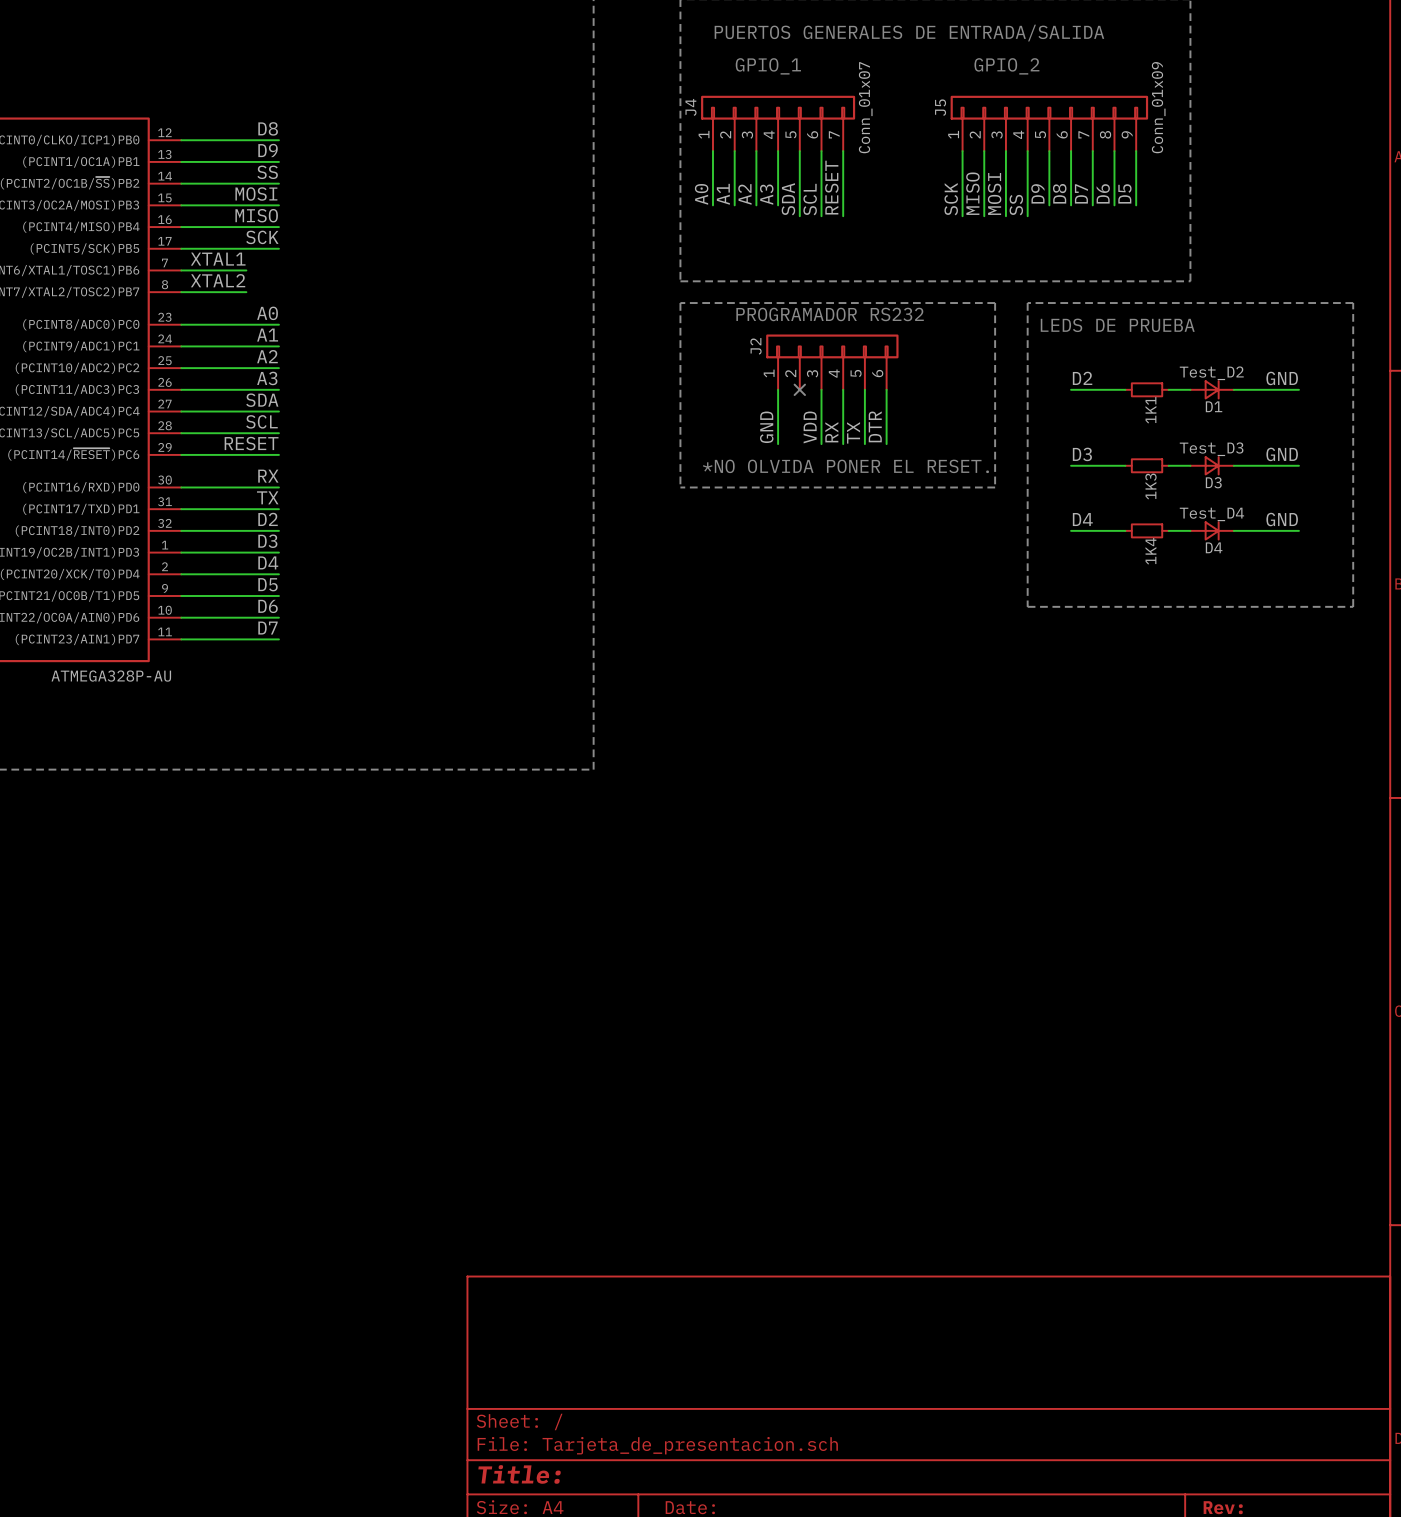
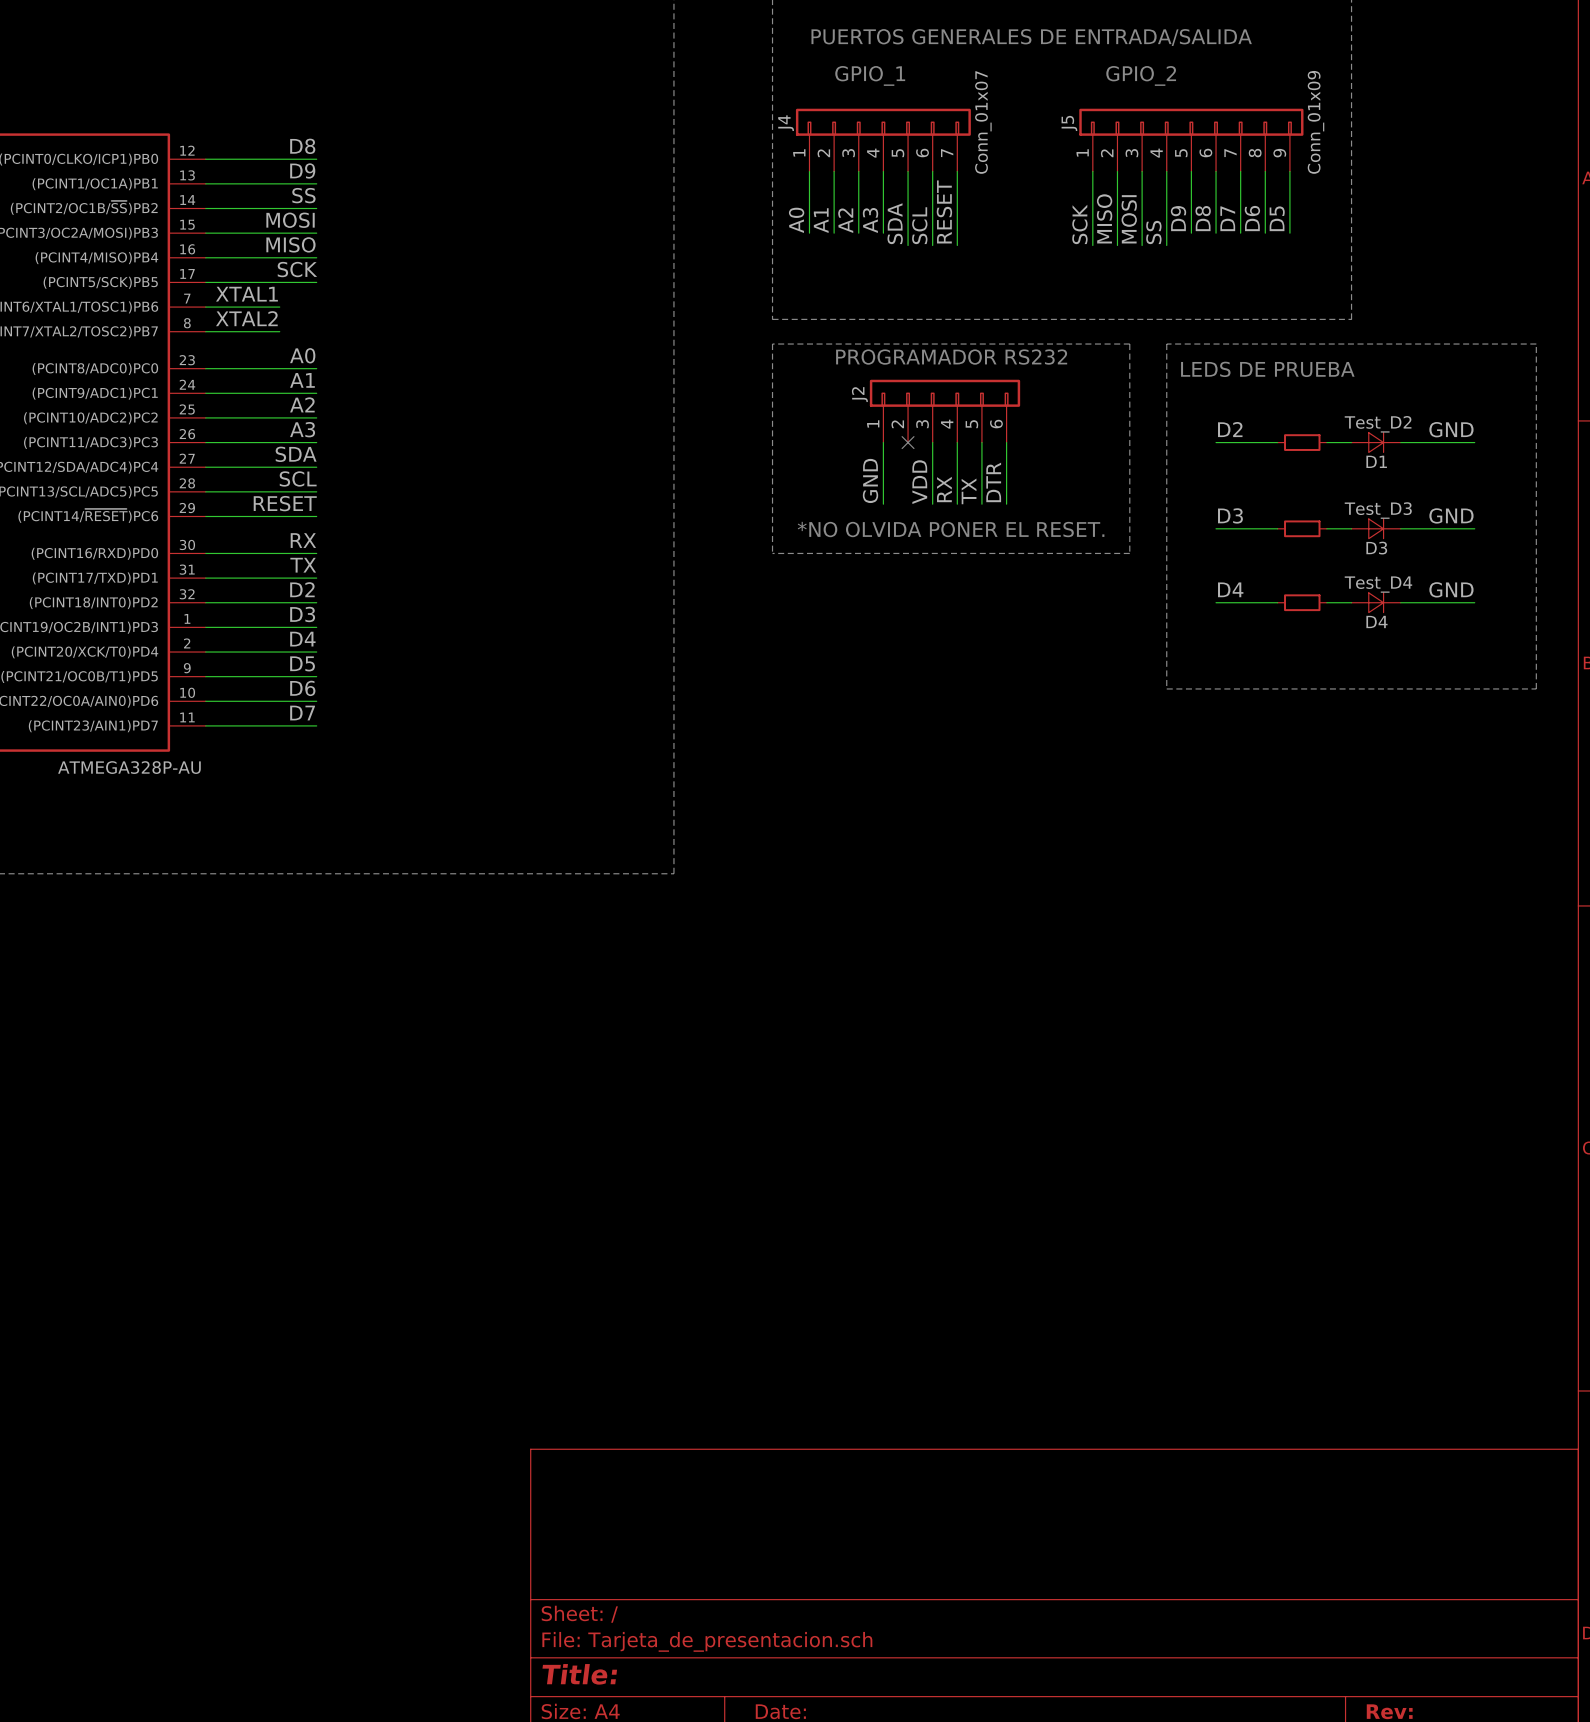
1K1 name: 1K1 (1150, 410) -> none
1K3 name: 1K3 (1150, 486) -> none
1K4 name: 1K4 (1150, 551) -> none

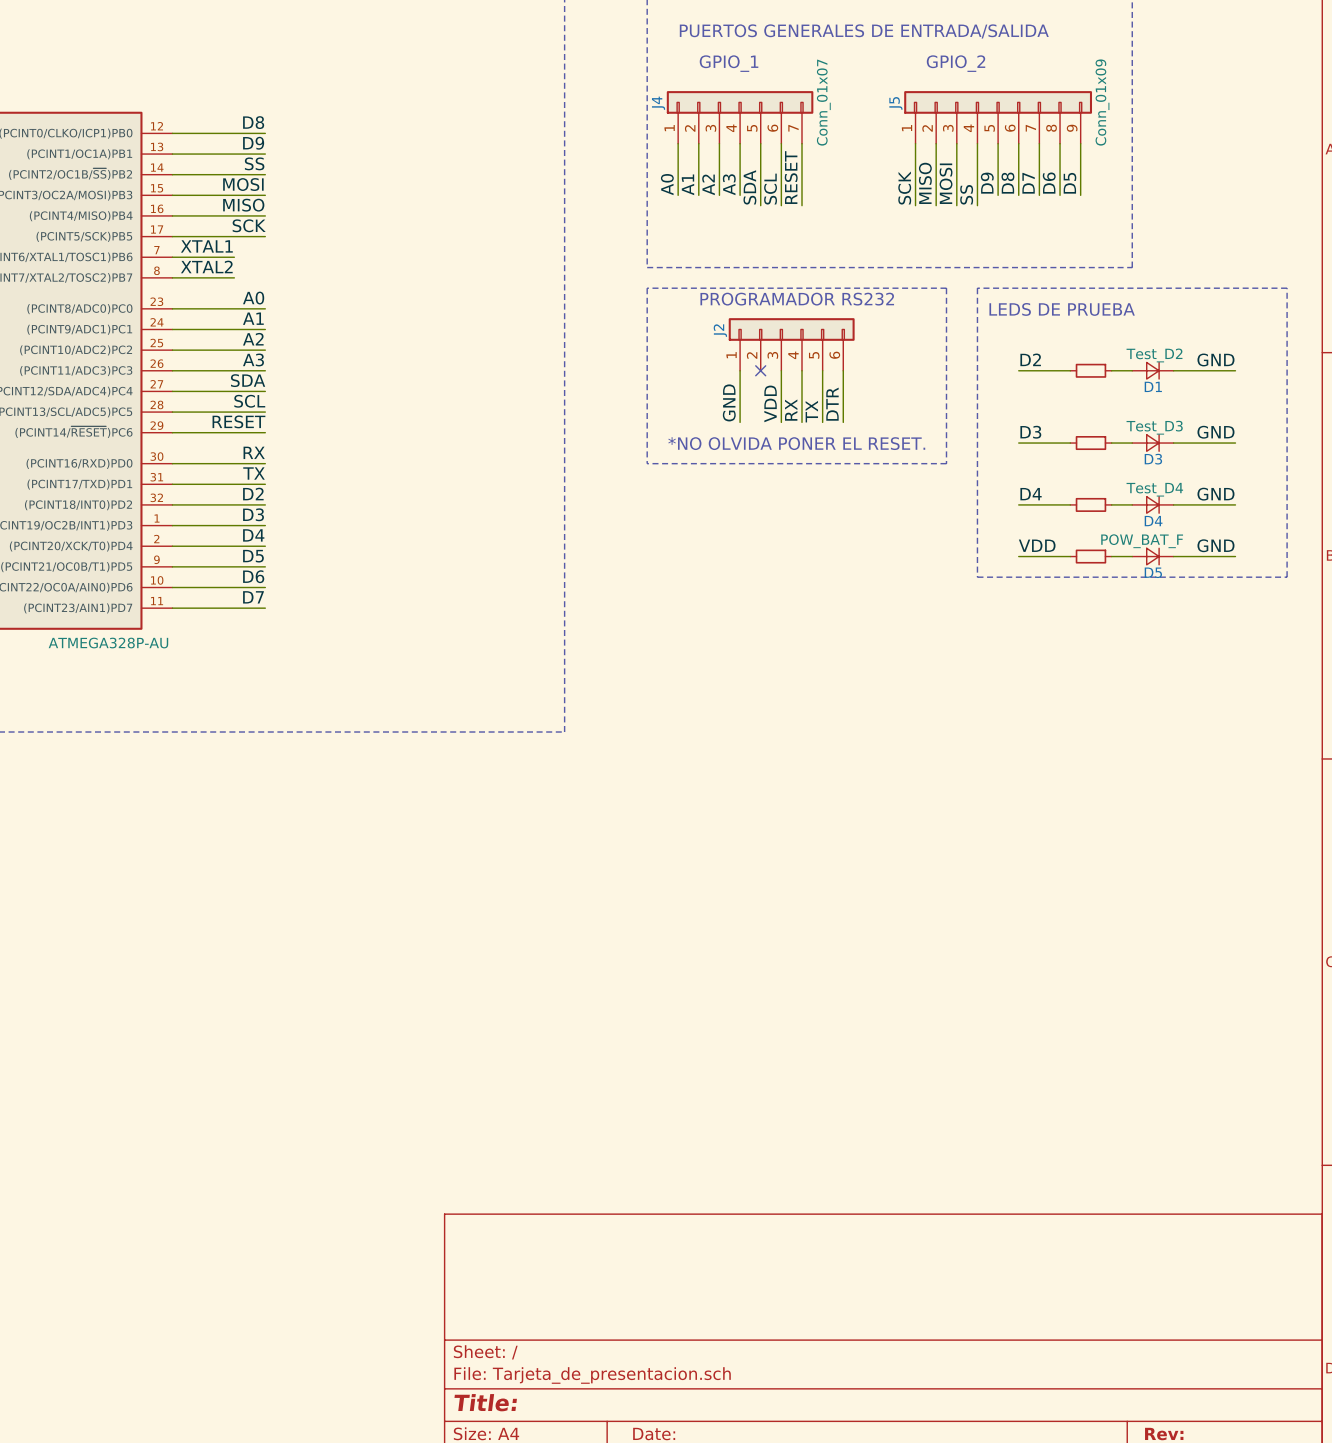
label: none -> VDD (1037, 545)
label: none -> GND (1215, 545)
wire: none -> (1018, 556) (1070, 556)
part: none -> (1090, 556)
wire: none -> (1111, 556) (1132, 556)
D5: none -> POW_BAT_F (1152, 556)
wire: none -> (1173, 556) (1235, 556)

